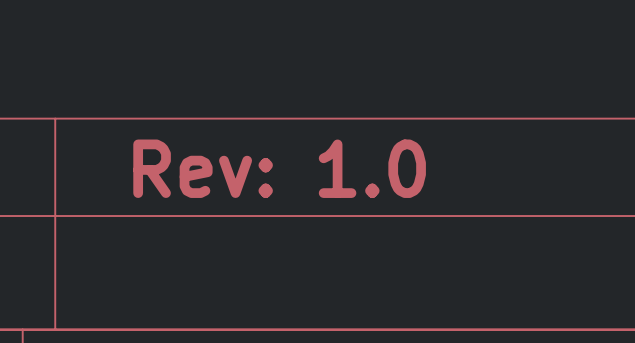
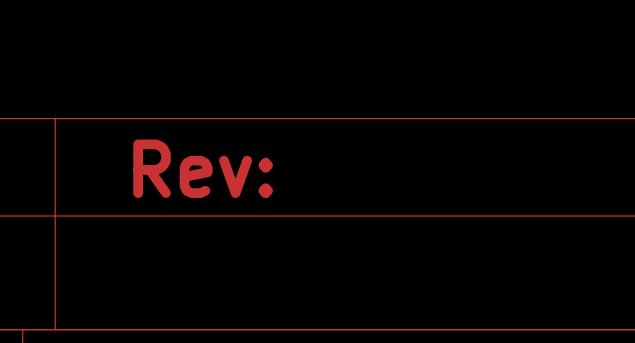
title block: Rev: 1.0 (279, 168) -> Rev: (203, 168)

